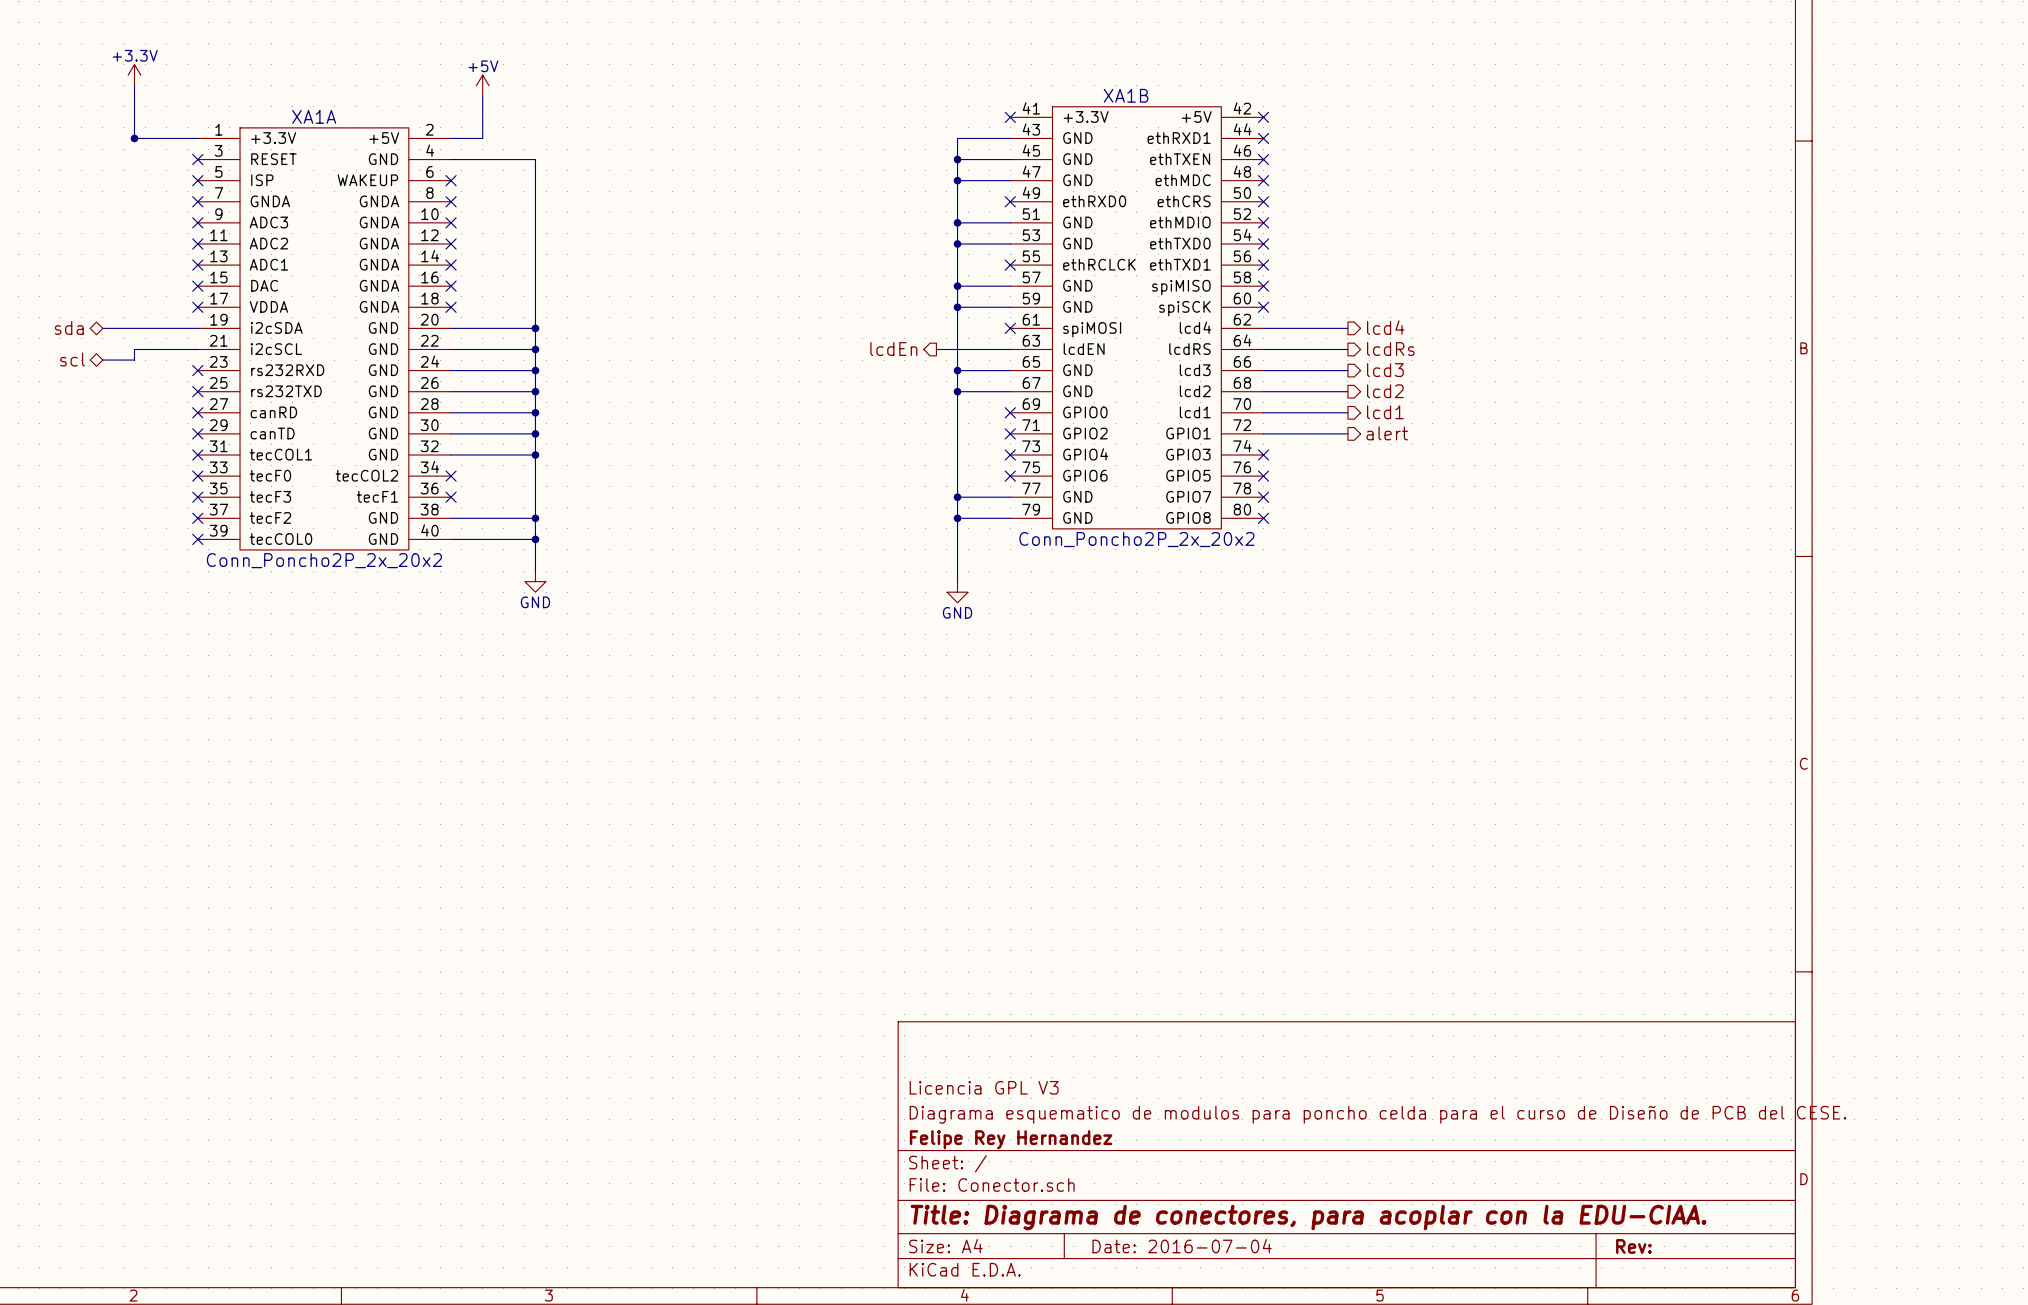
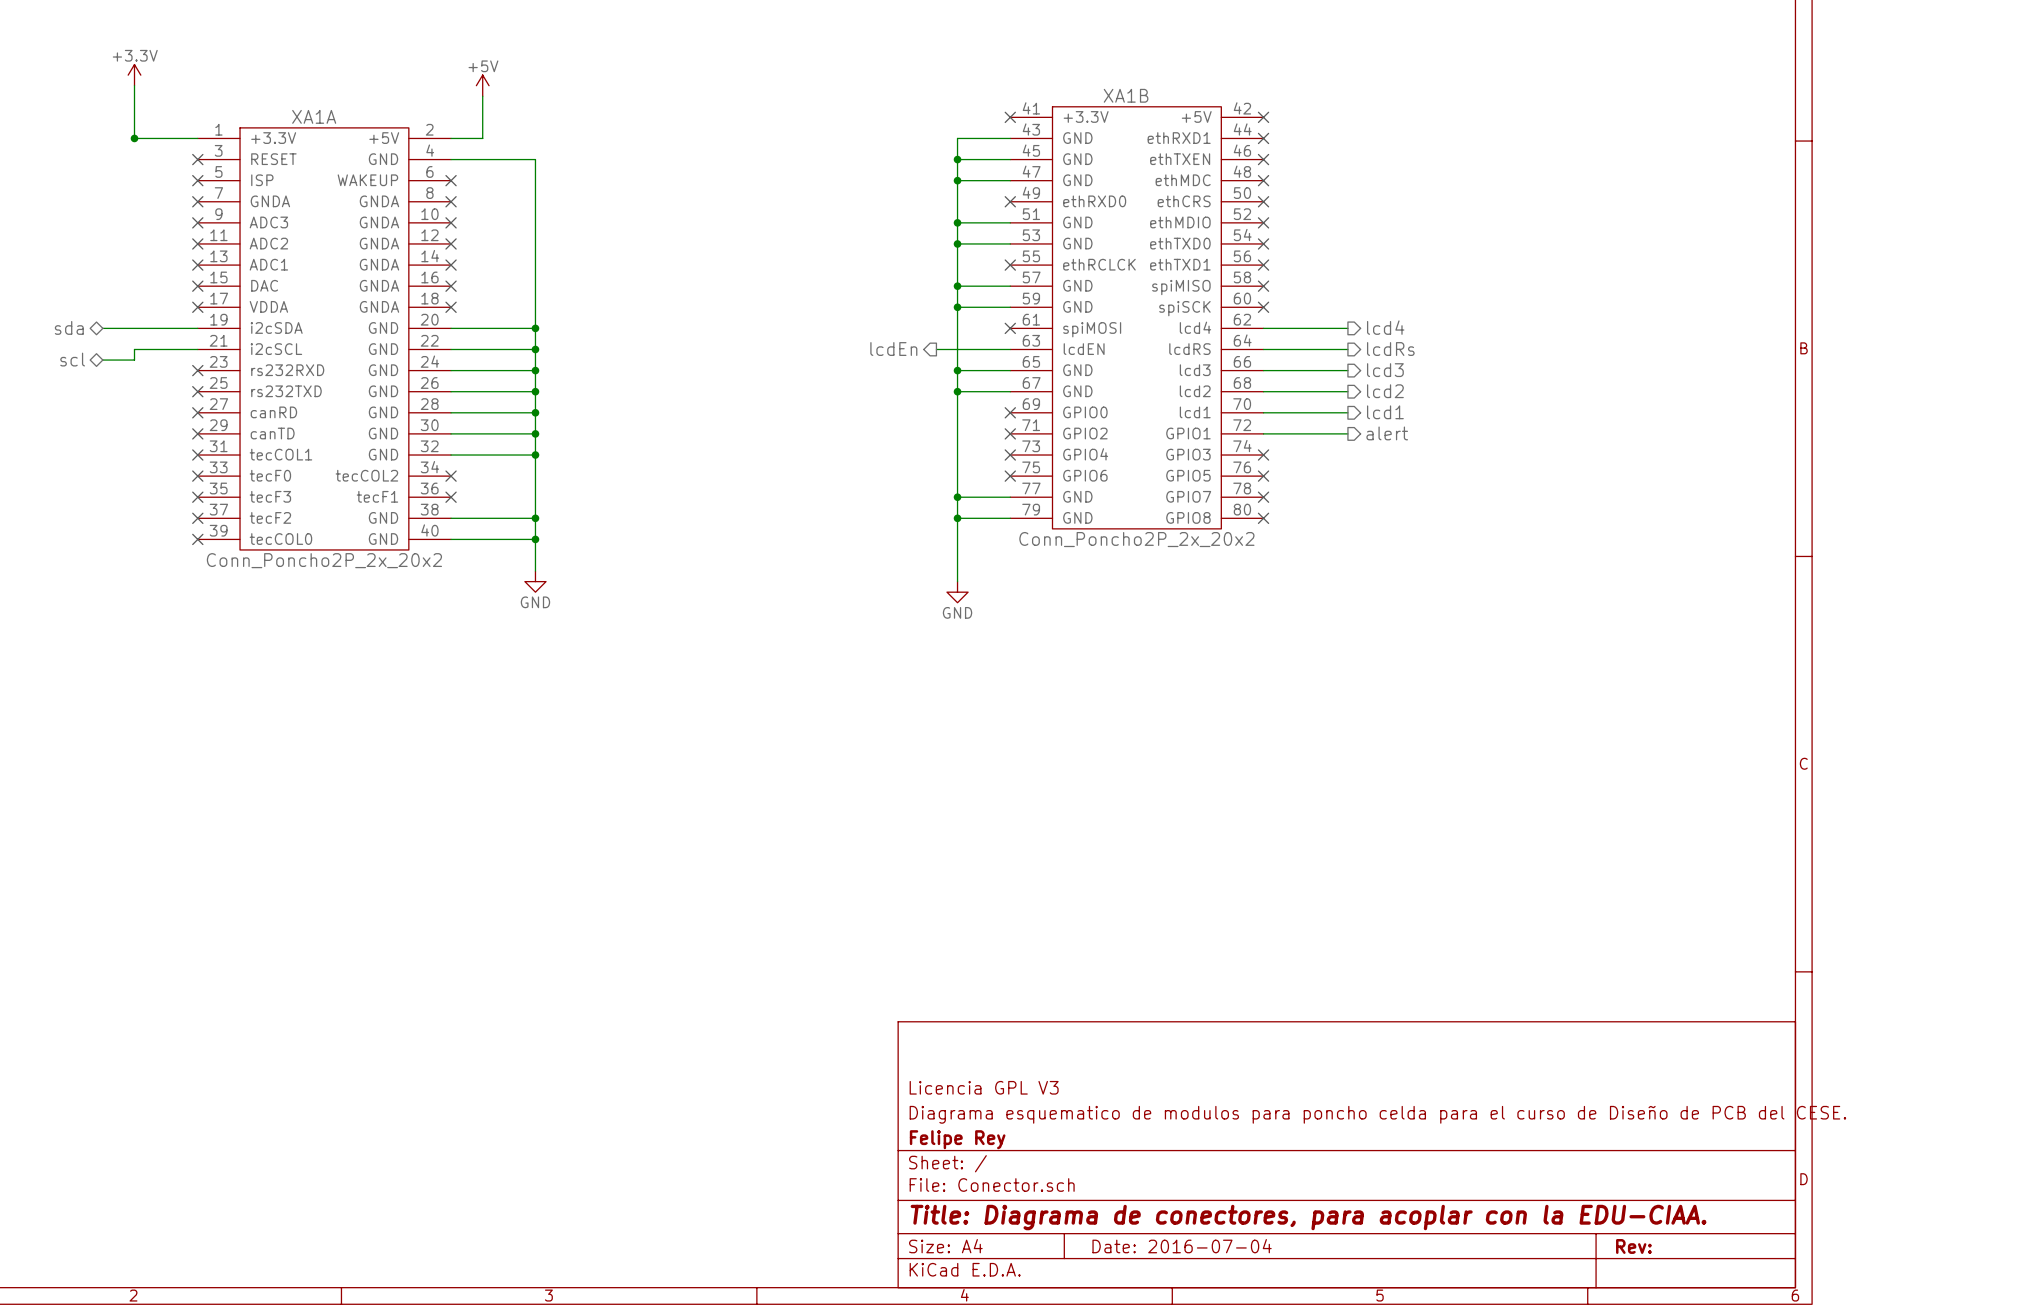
title block: Felipe Rey Hernandez (1011, 1139) -> Felipe Rey (957, 1139)

